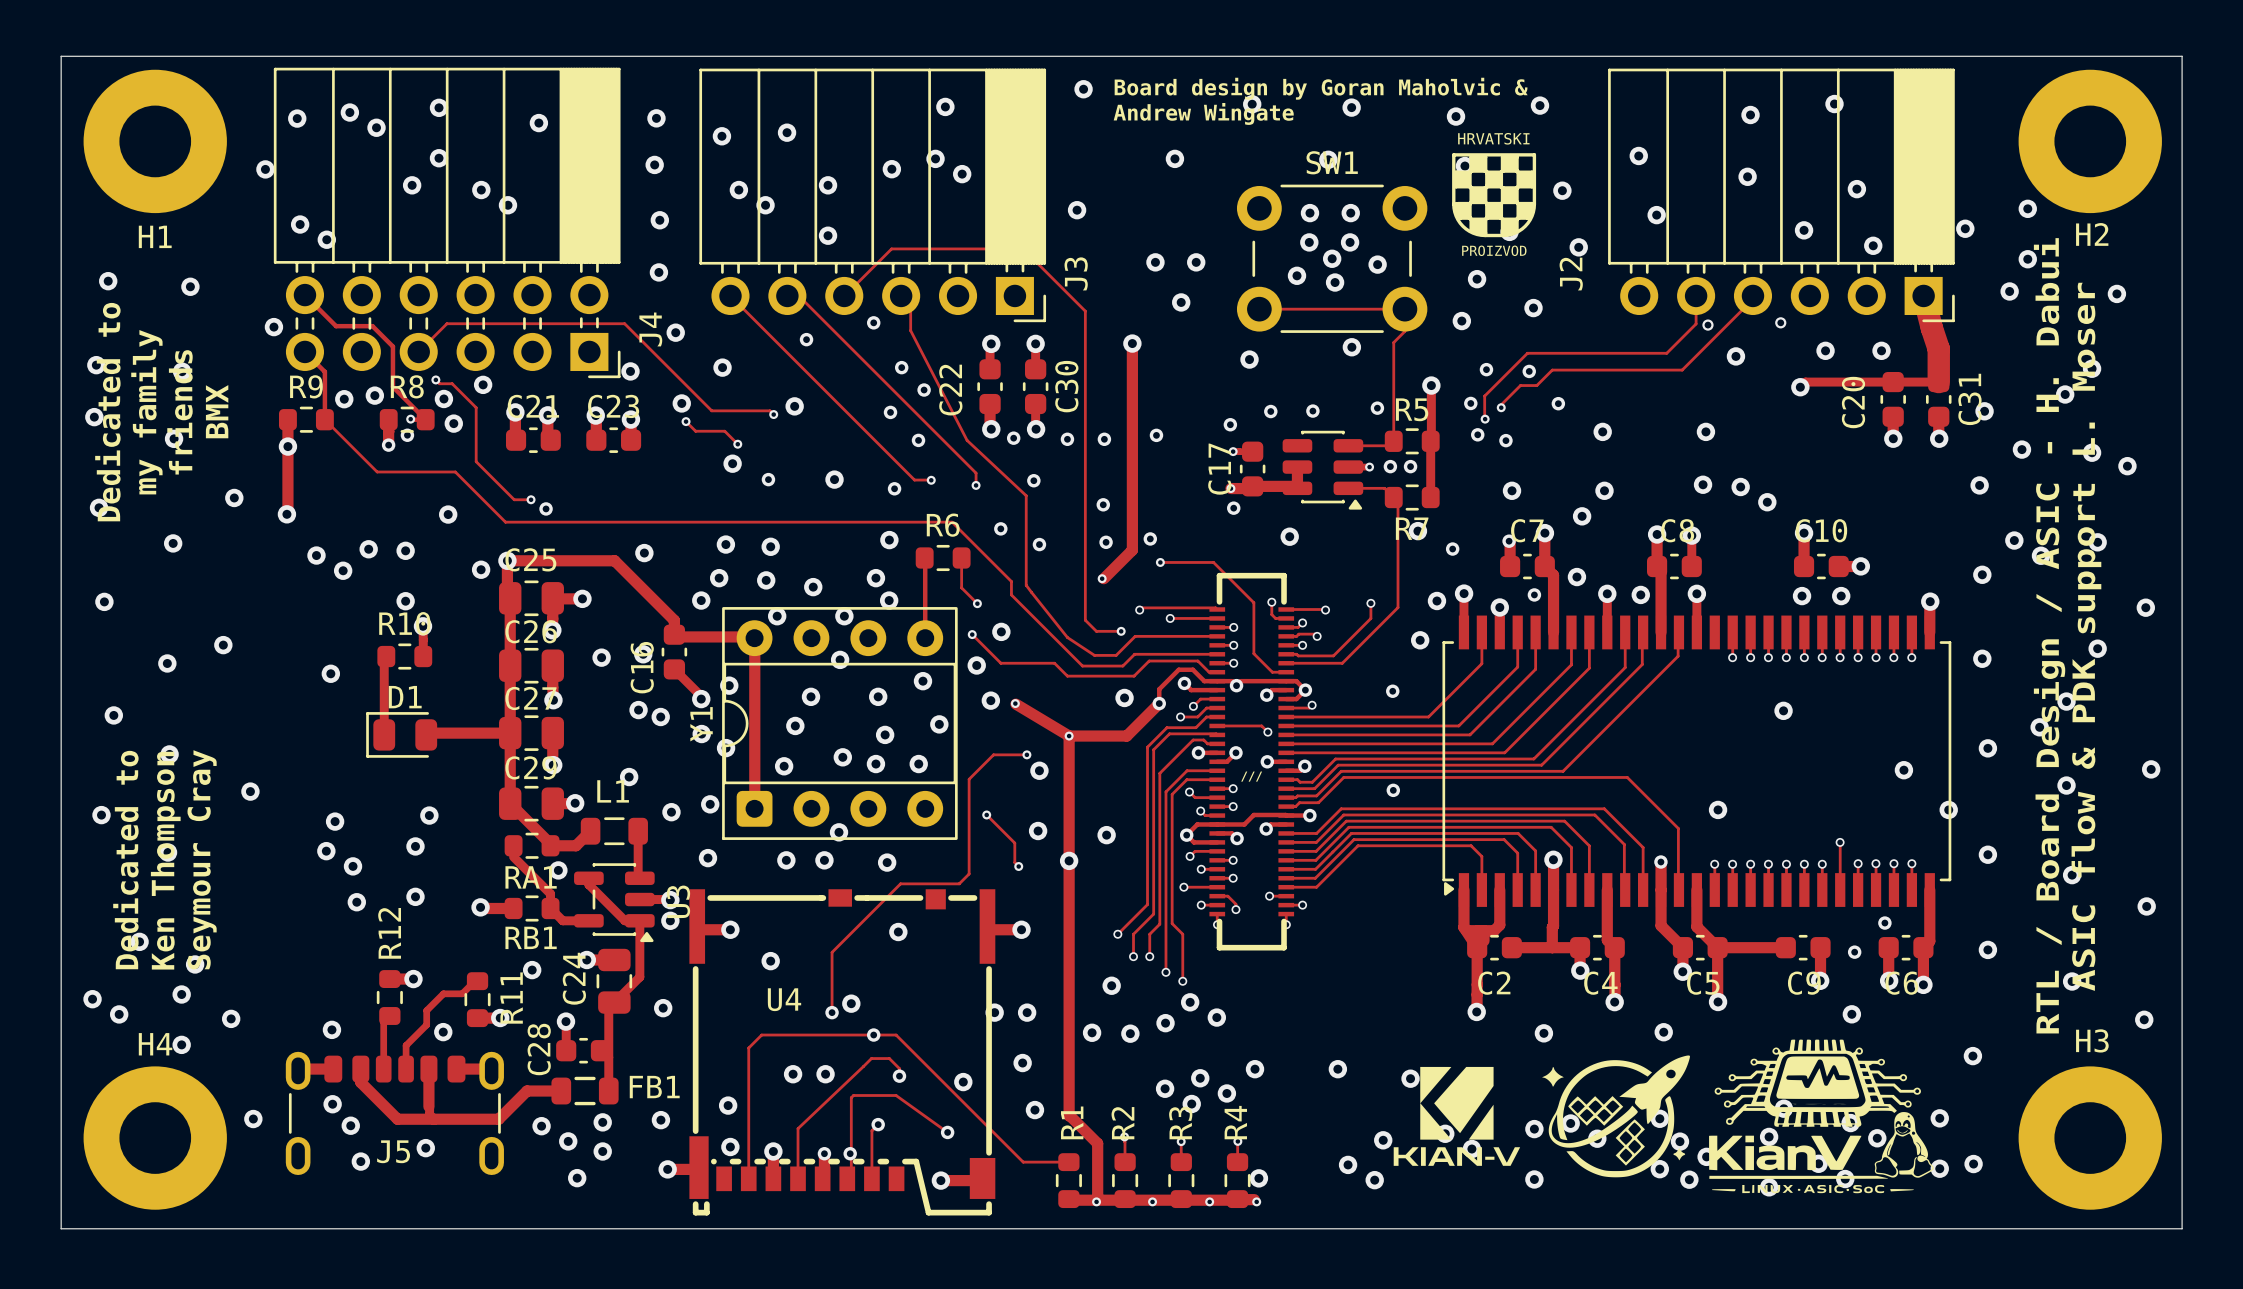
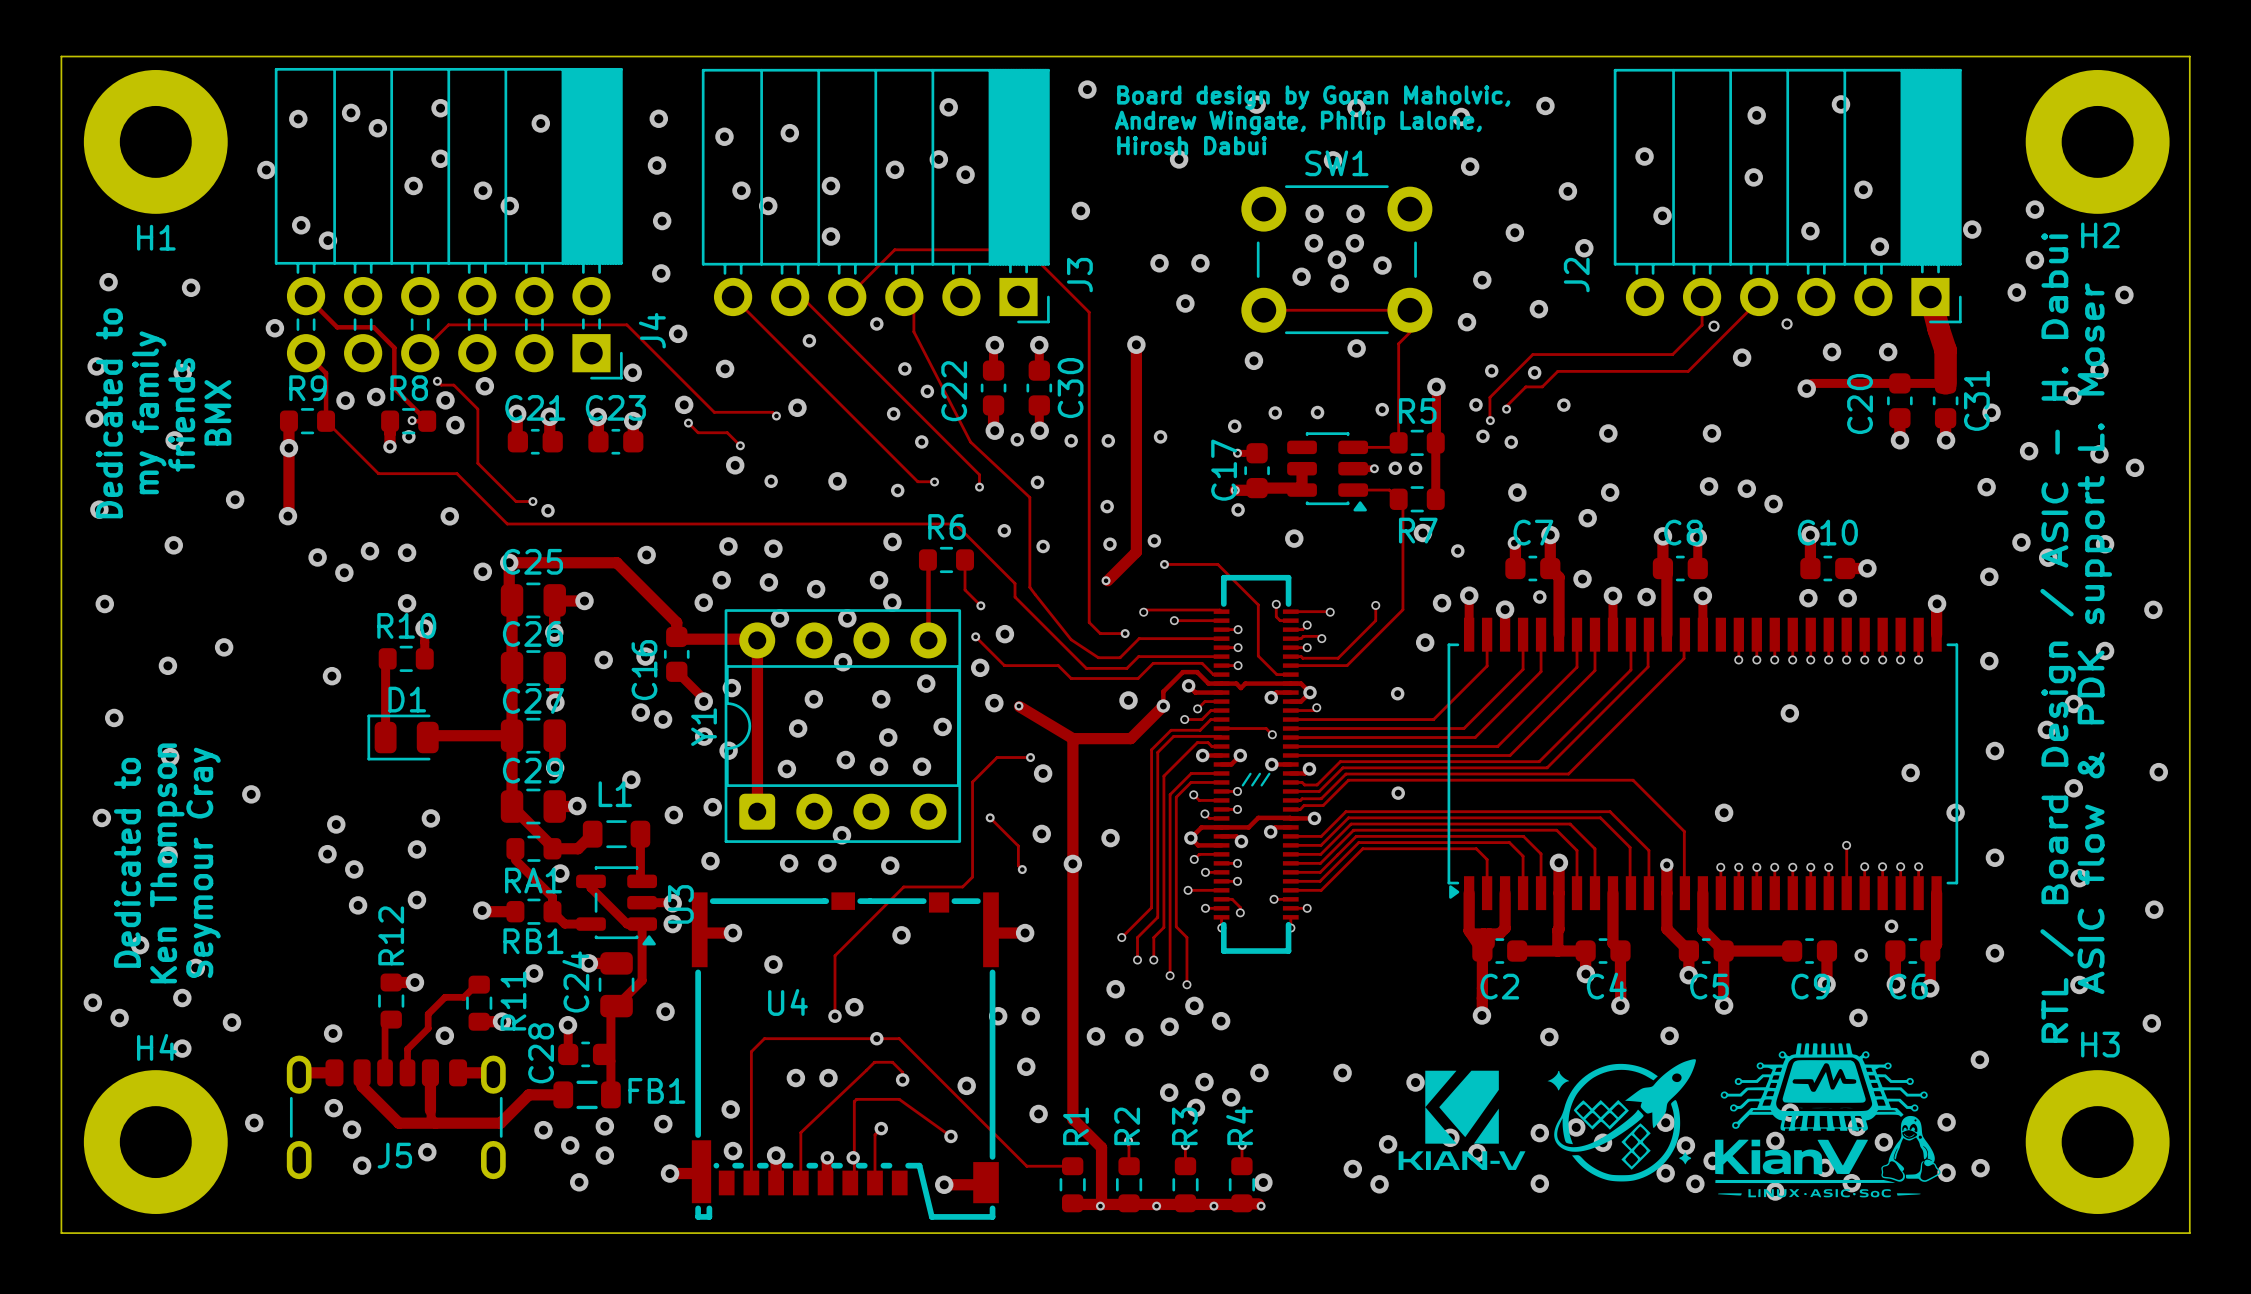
text: Board design by Goran Maholvic & (1321, 88) -> Board design by Goran Maholvic, (1313, 97)
text: Andrew Wingate (1203, 113) -> Andrew Wingate, Philip Lalone, (1298, 122)
text: none -> Hirosh Dabui (1191, 145)
drawing: [1452, 153, 1537, 238] -> none
via: (1236, 685) -> none
via: (1069, 736) -> none

